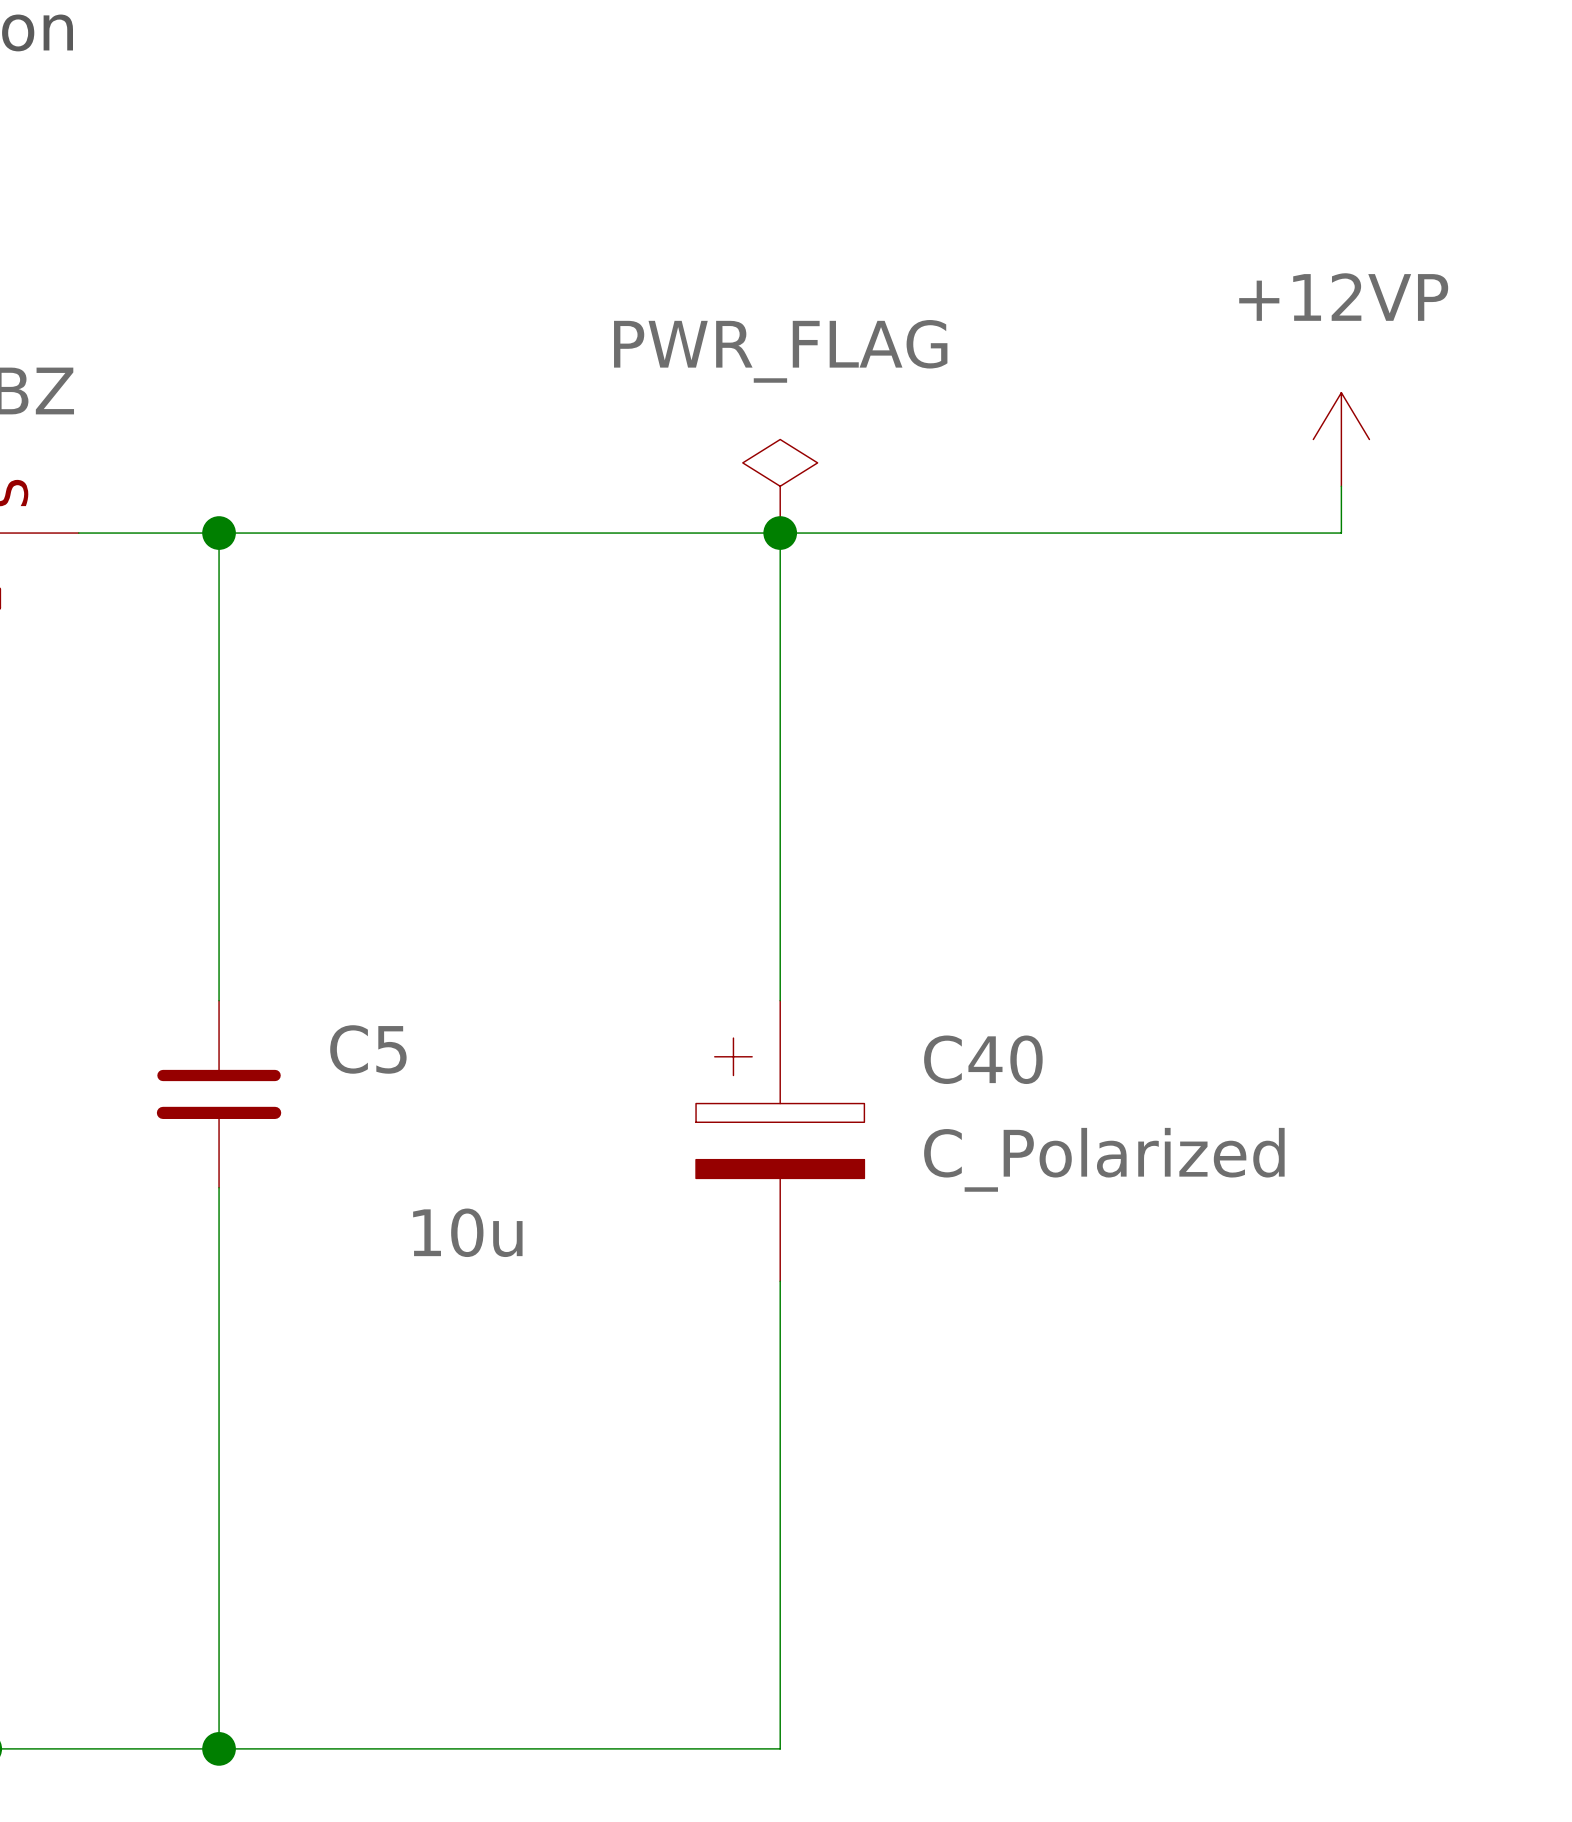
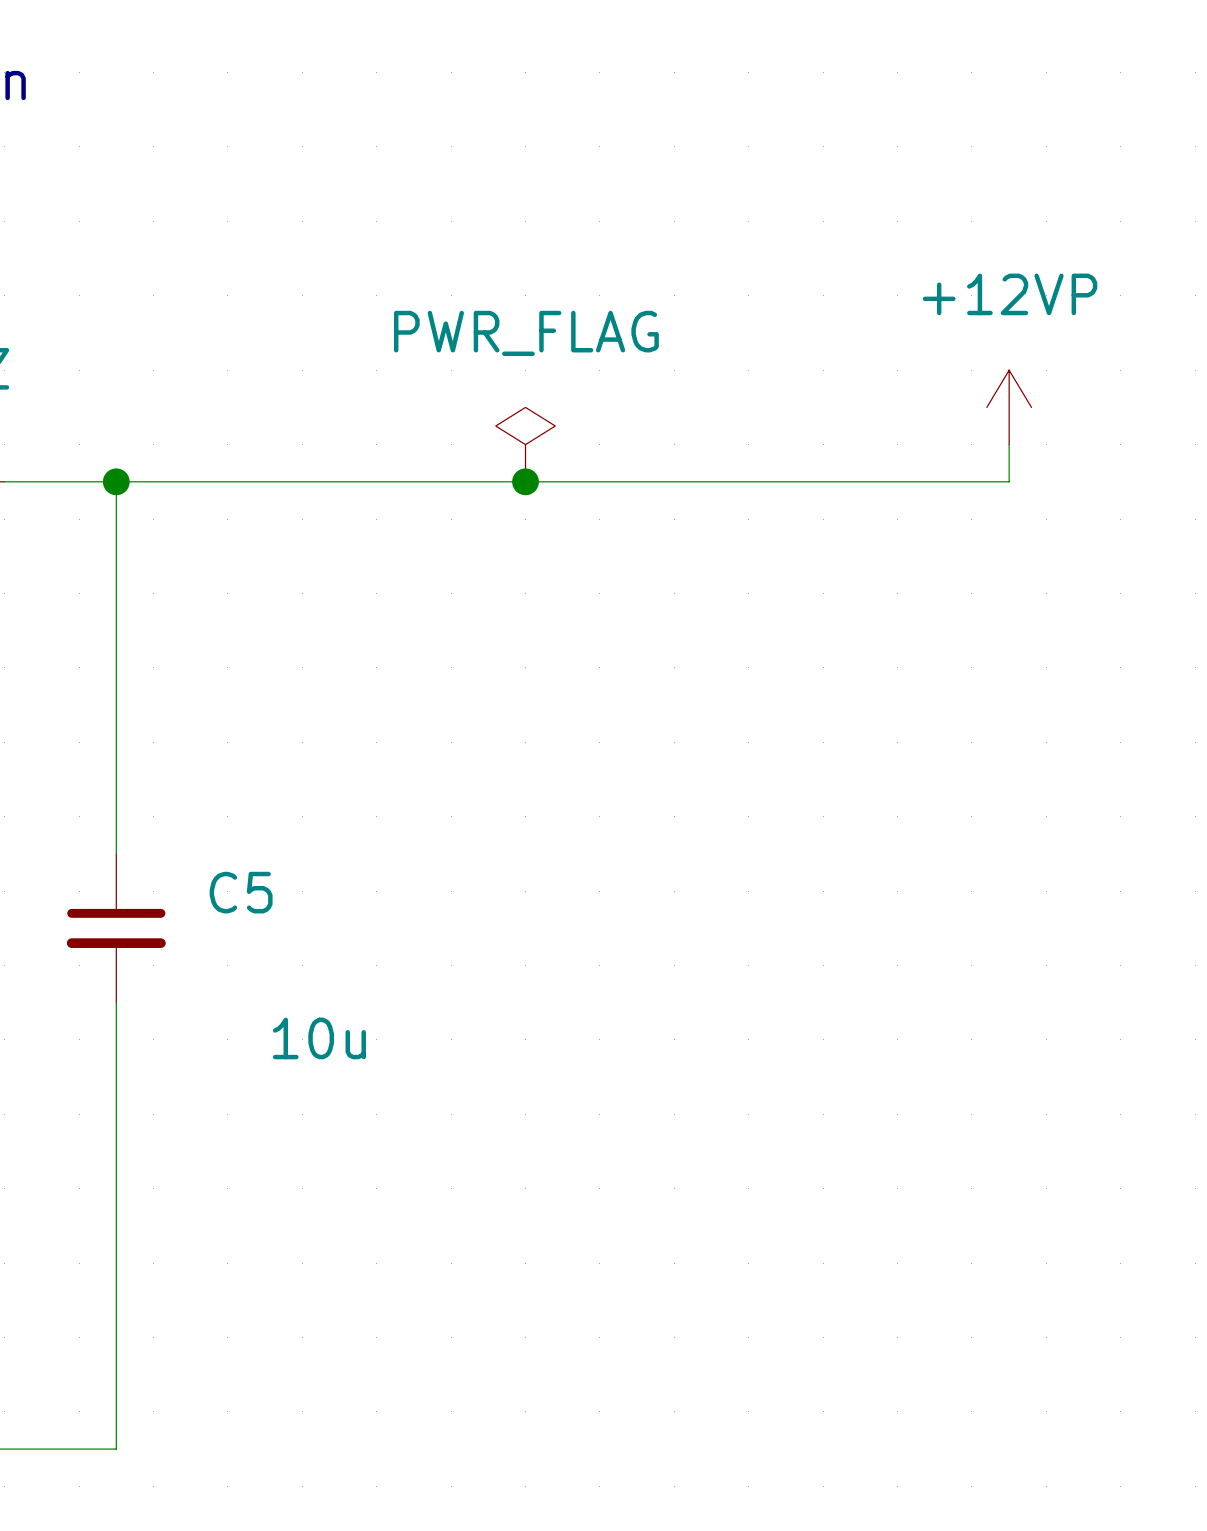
power symbol position: PWR_FLAG (780, 486) -> PWR_FLAG (525, 444)
wire: (780, 533) (780, 1000) -> none
junction position: (780, 533) -> (525, 481)
C40: C_Polarized (780, 1140) -> none
wire: (780, 1281) (780, 1748) (219, 1748) -> none
junction: (219, 1748) -> none

